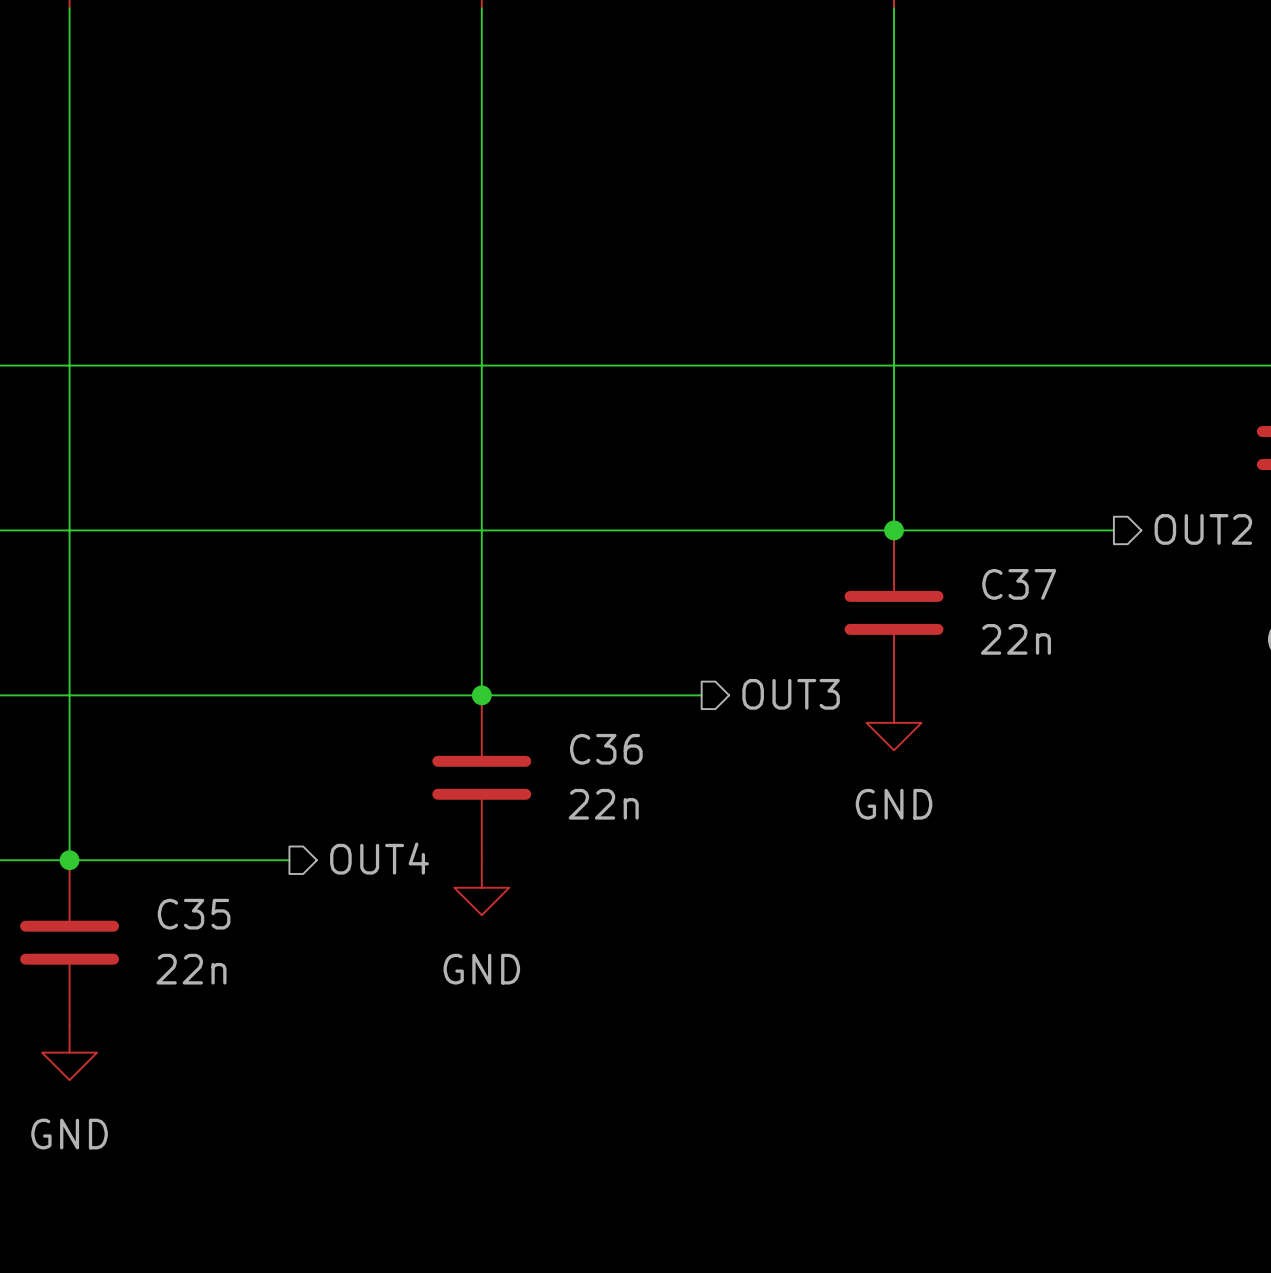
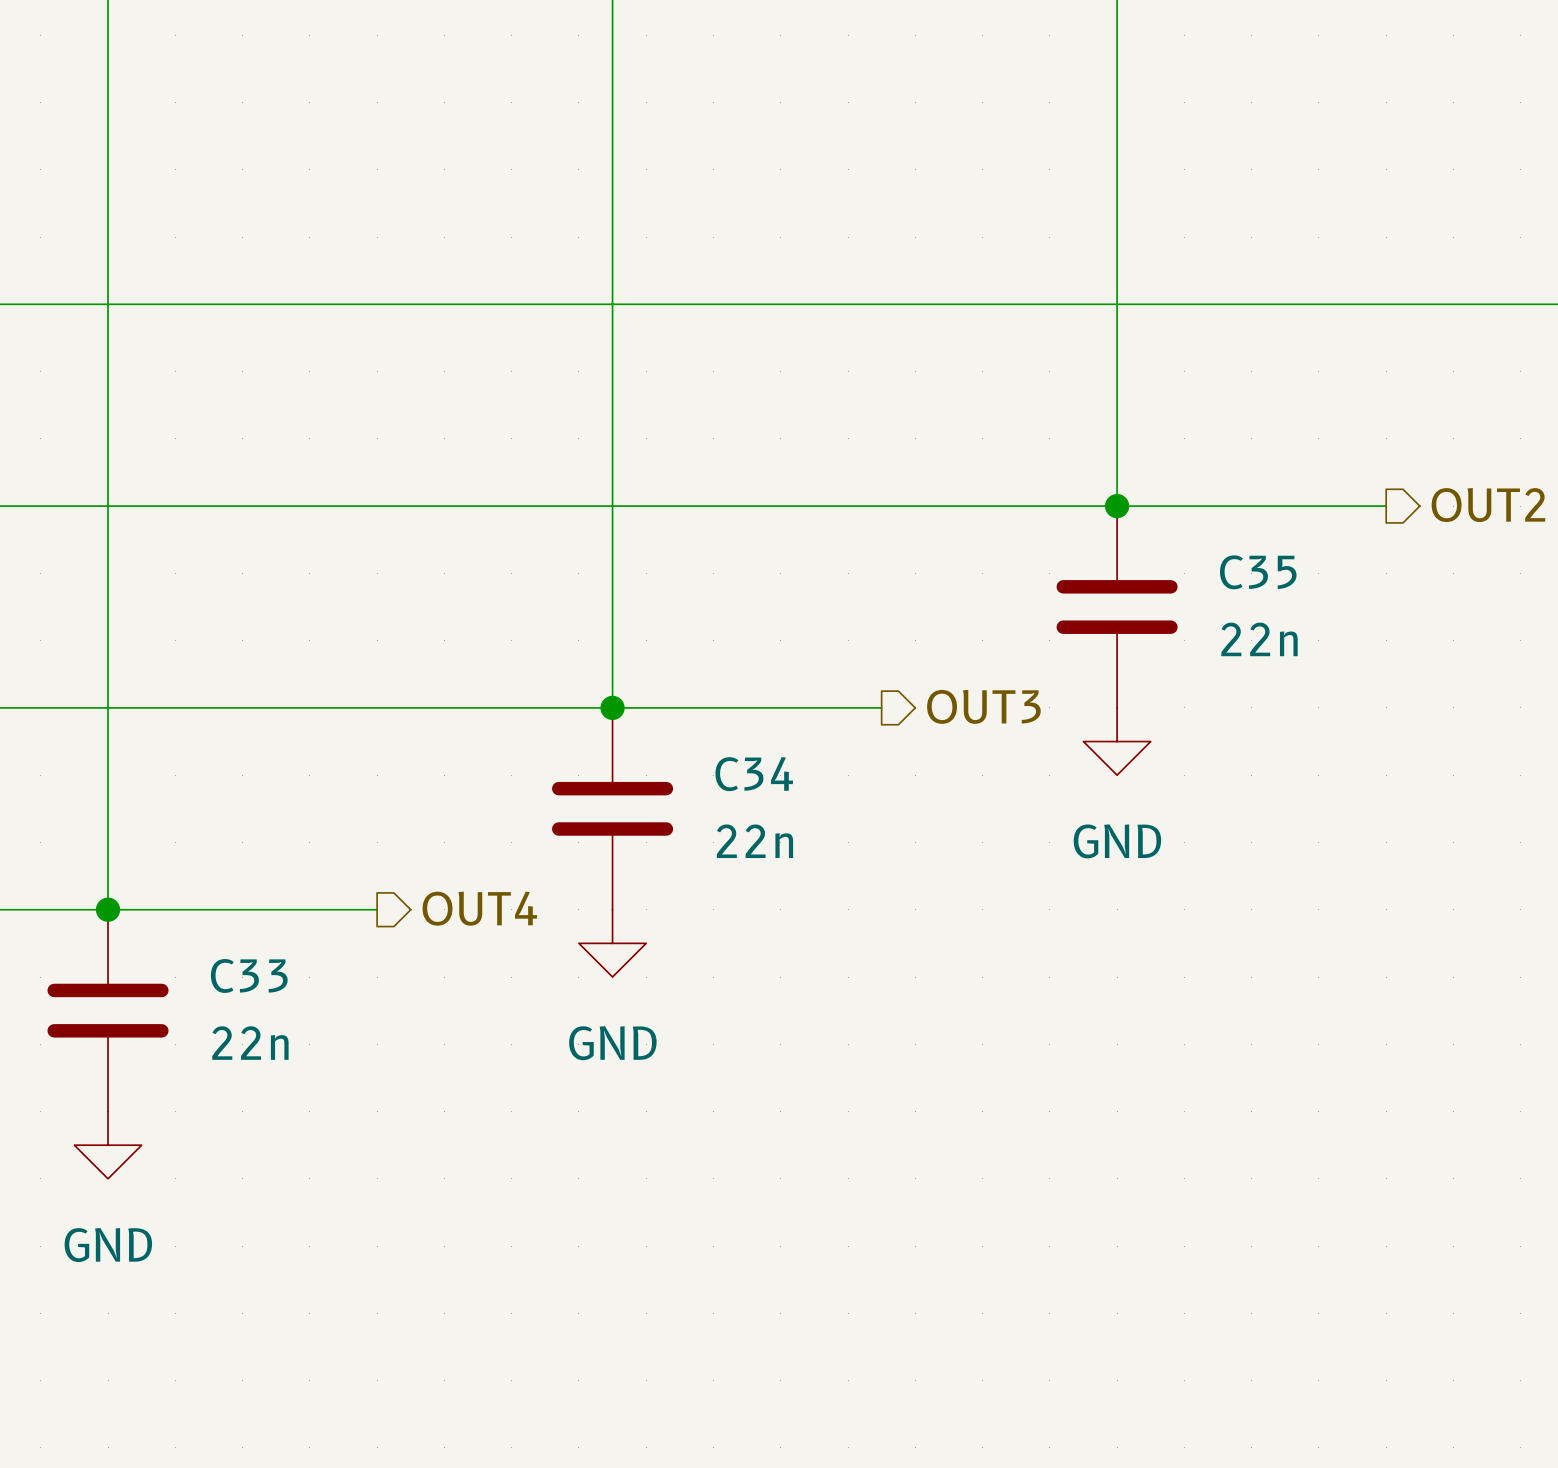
C37 name: C37 (1019, 584) -> C35 (1258, 572)
C36 name: C36 (606, 749) -> C34 (754, 774)
C35 name: C35 (194, 914) -> C33 (249, 975)

